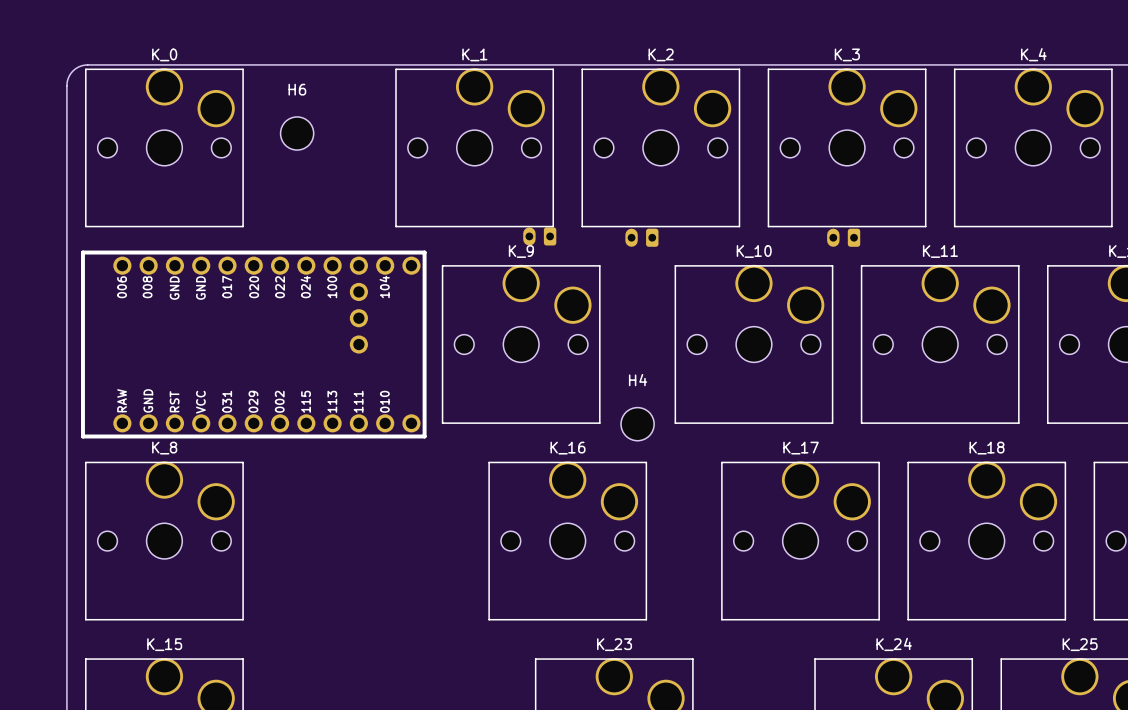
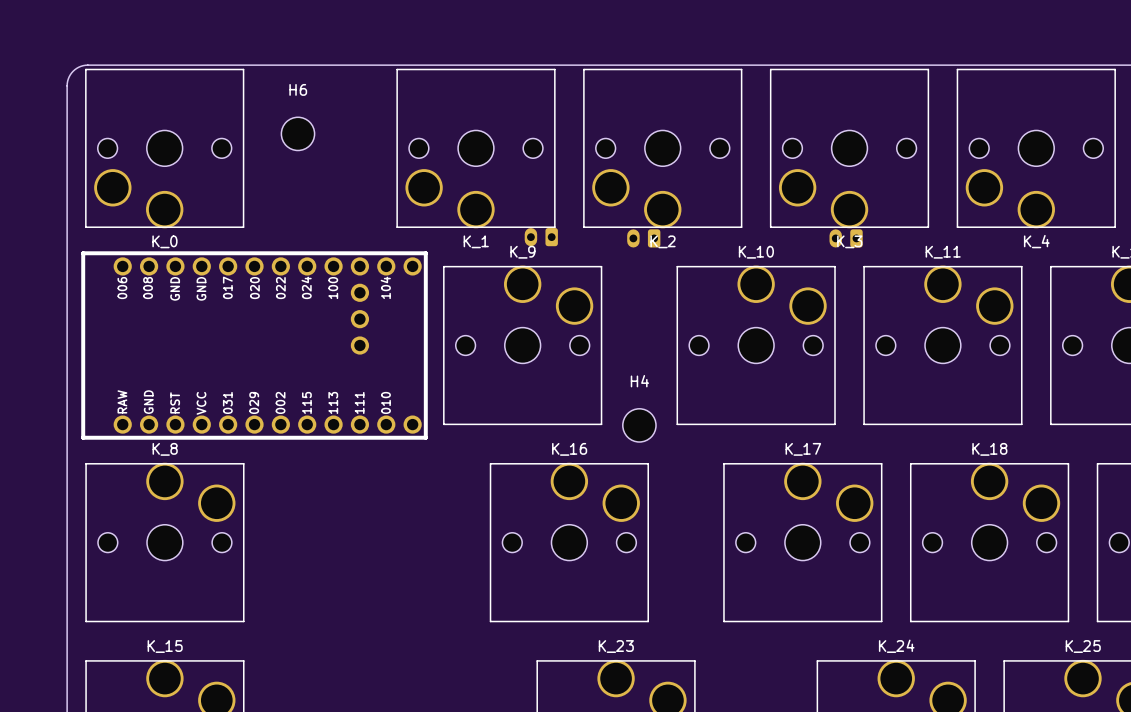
K_0 rotation: 0° (164, 147) -> 180° (164, 148)
K_1 rotation: 0° (474, 147) -> 180° (475, 148)
K_2 rotation: 0° (660, 147) -> 180° (662, 148)
K_3 rotation: 0° (847, 147) -> 180° (849, 148)
K_4 rotation: 0° (1033, 147) -> 180° (1036, 148)

